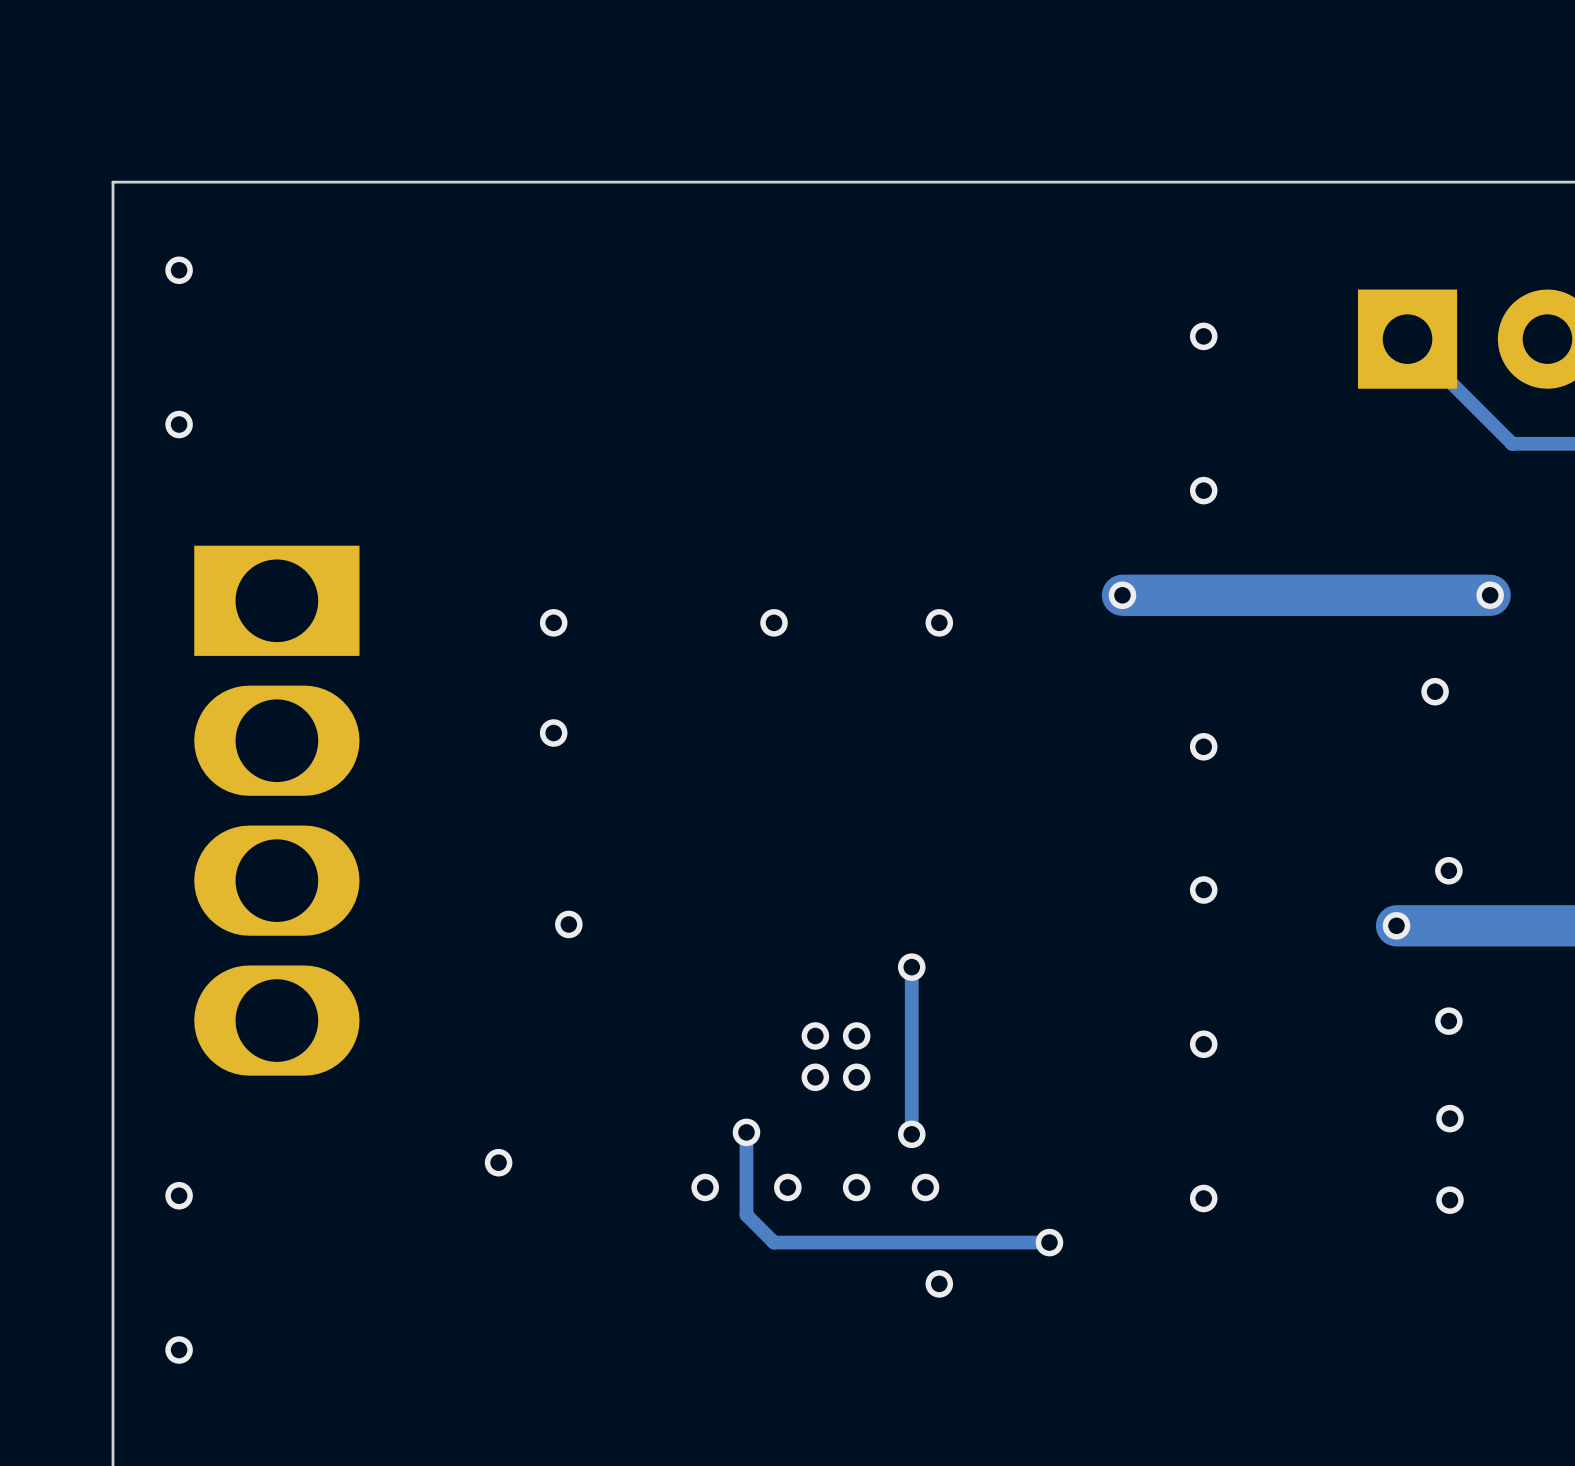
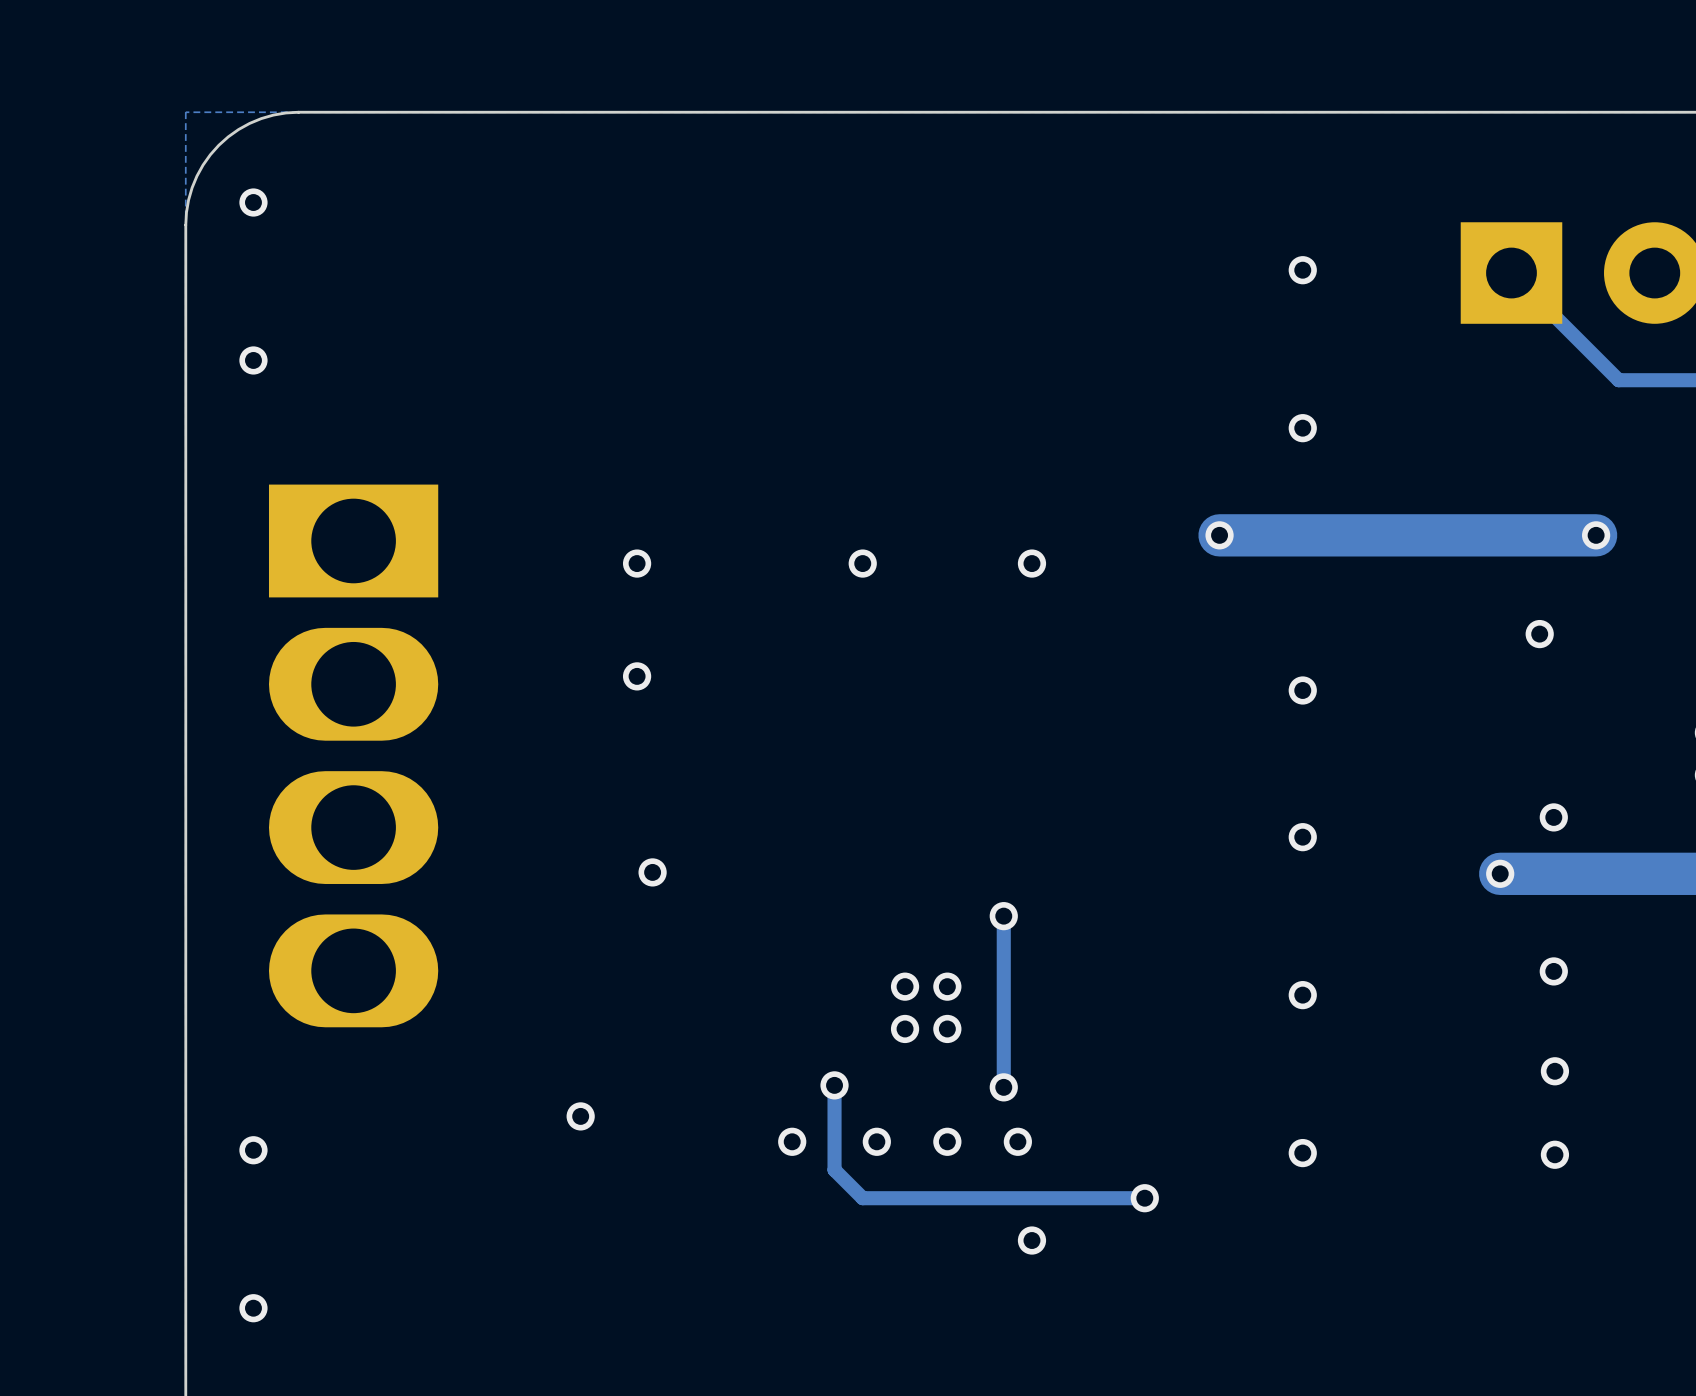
board edge: (223, 182) (112, 182) (112, 292) -> (298, 112) (261, 118) (238, 129) (218, 145) (203, 165) (192, 187) (185, 225)

